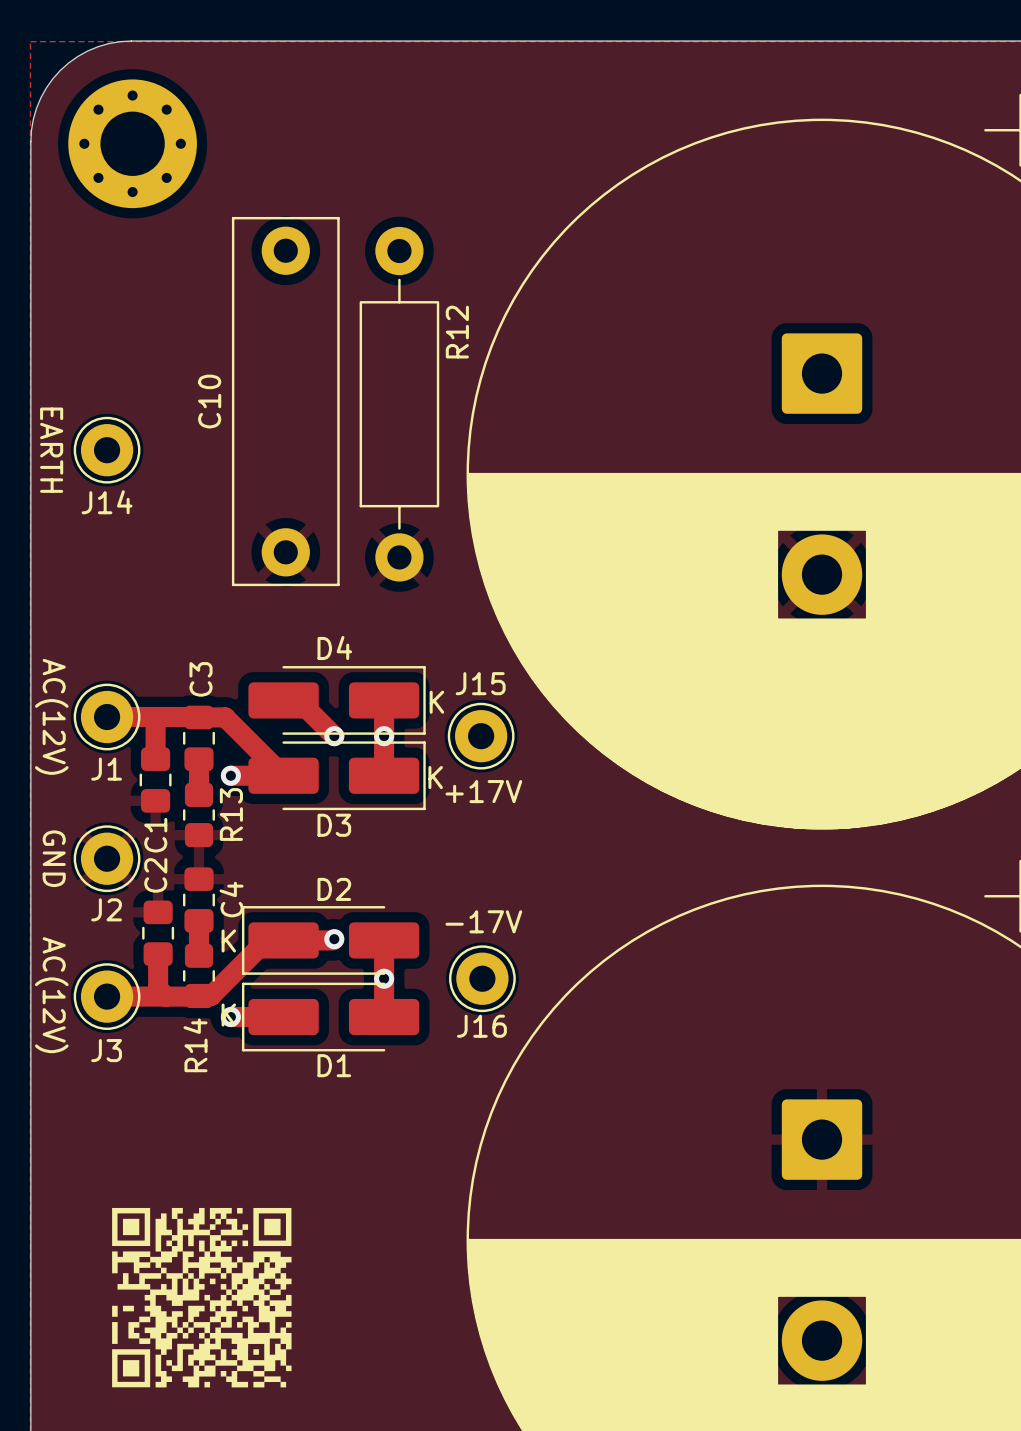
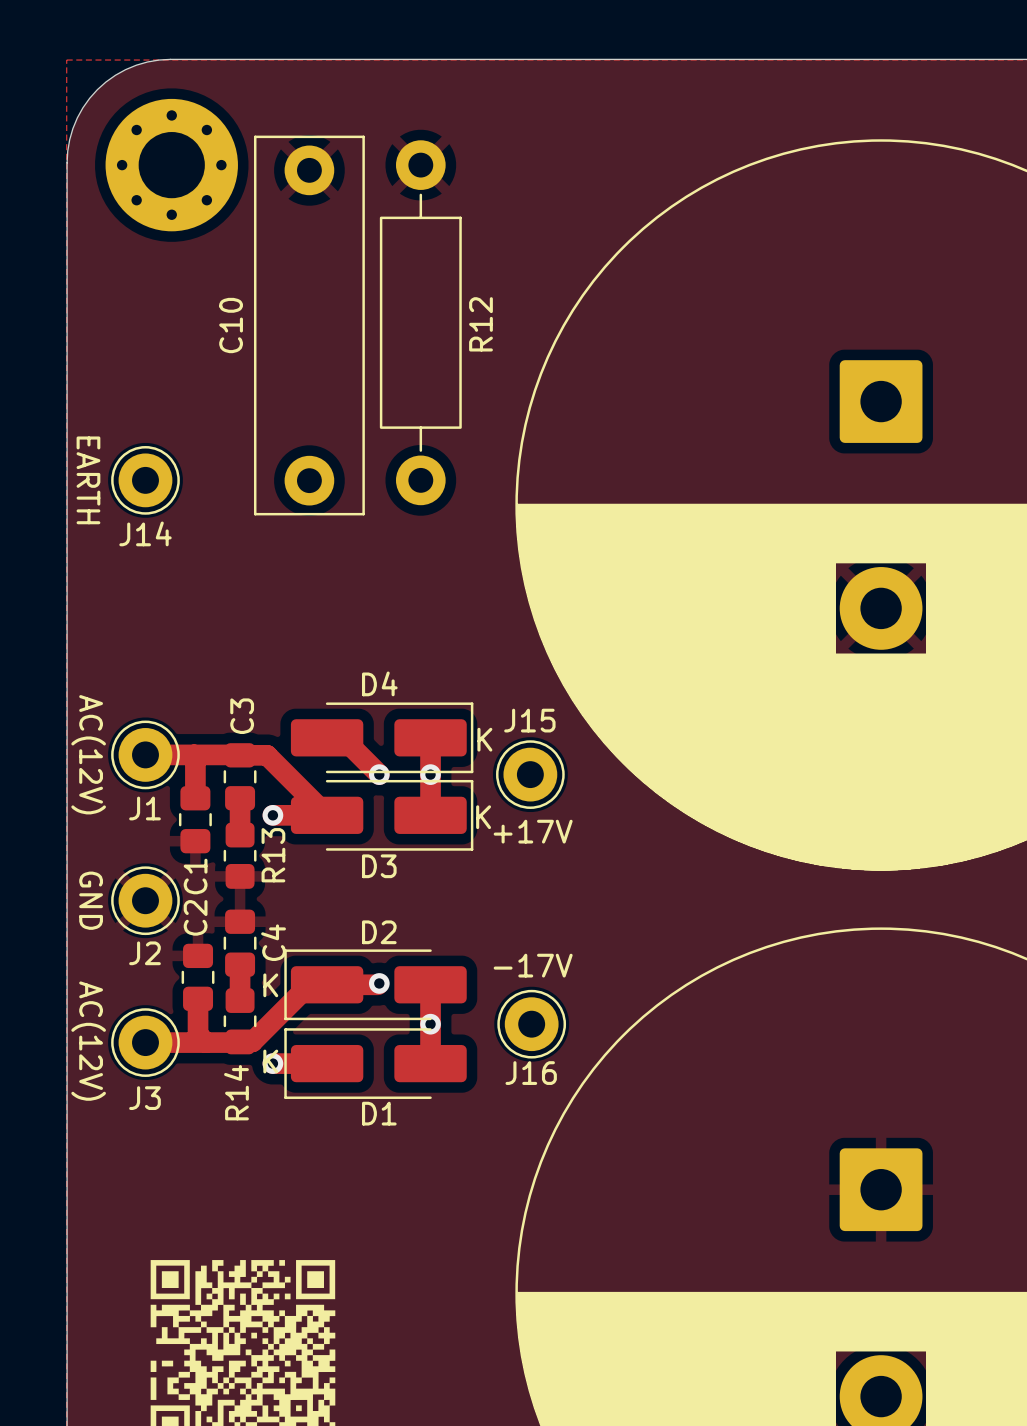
R12 name position: R12 (457, 332) -> R12 (480, 324)
C10 position: (285, 401) -> (309, 325)
R12 position: (399, 404) -> (420, 322)

